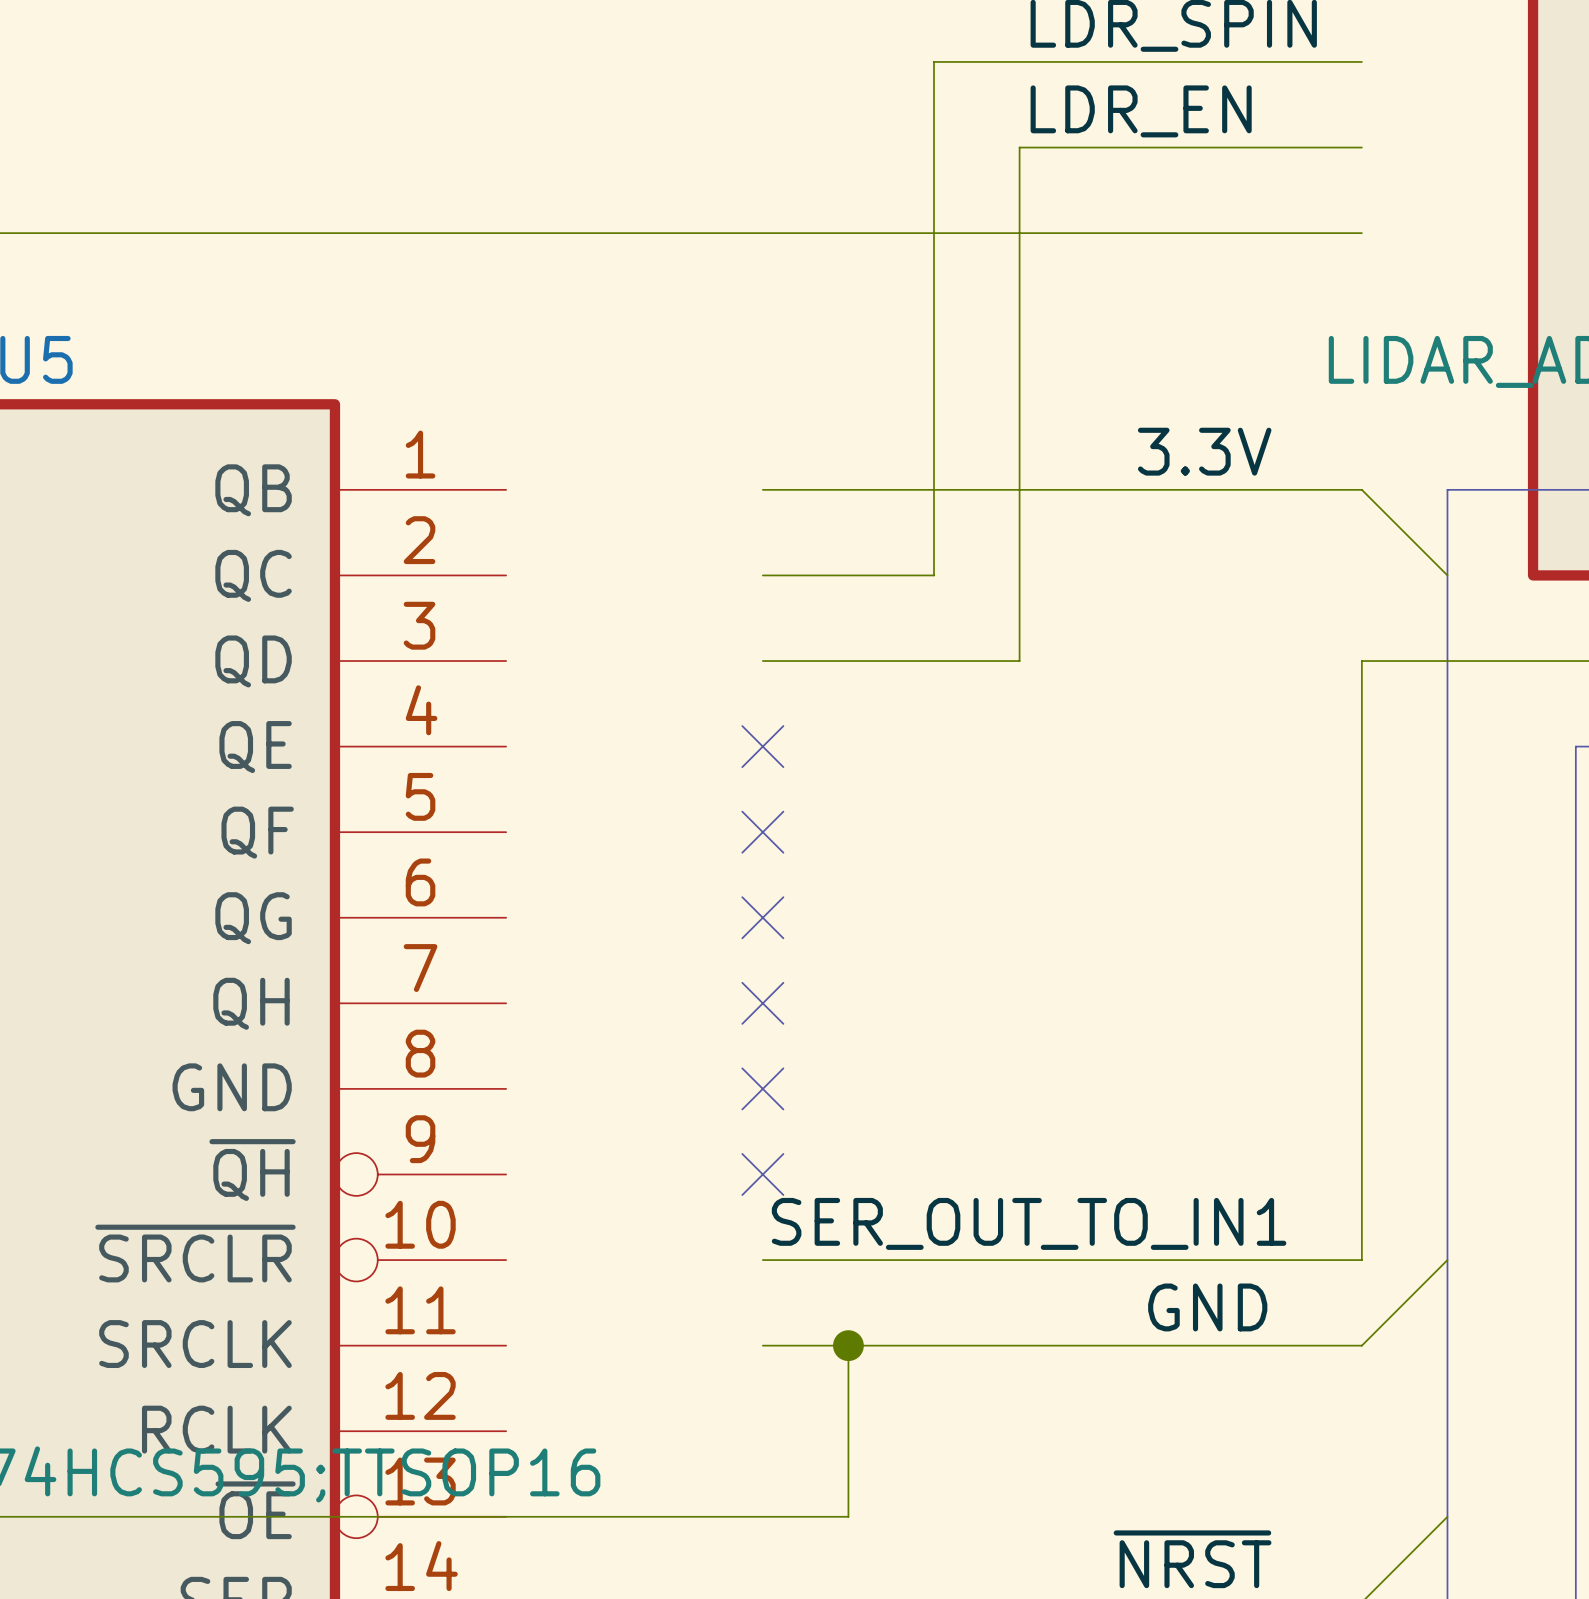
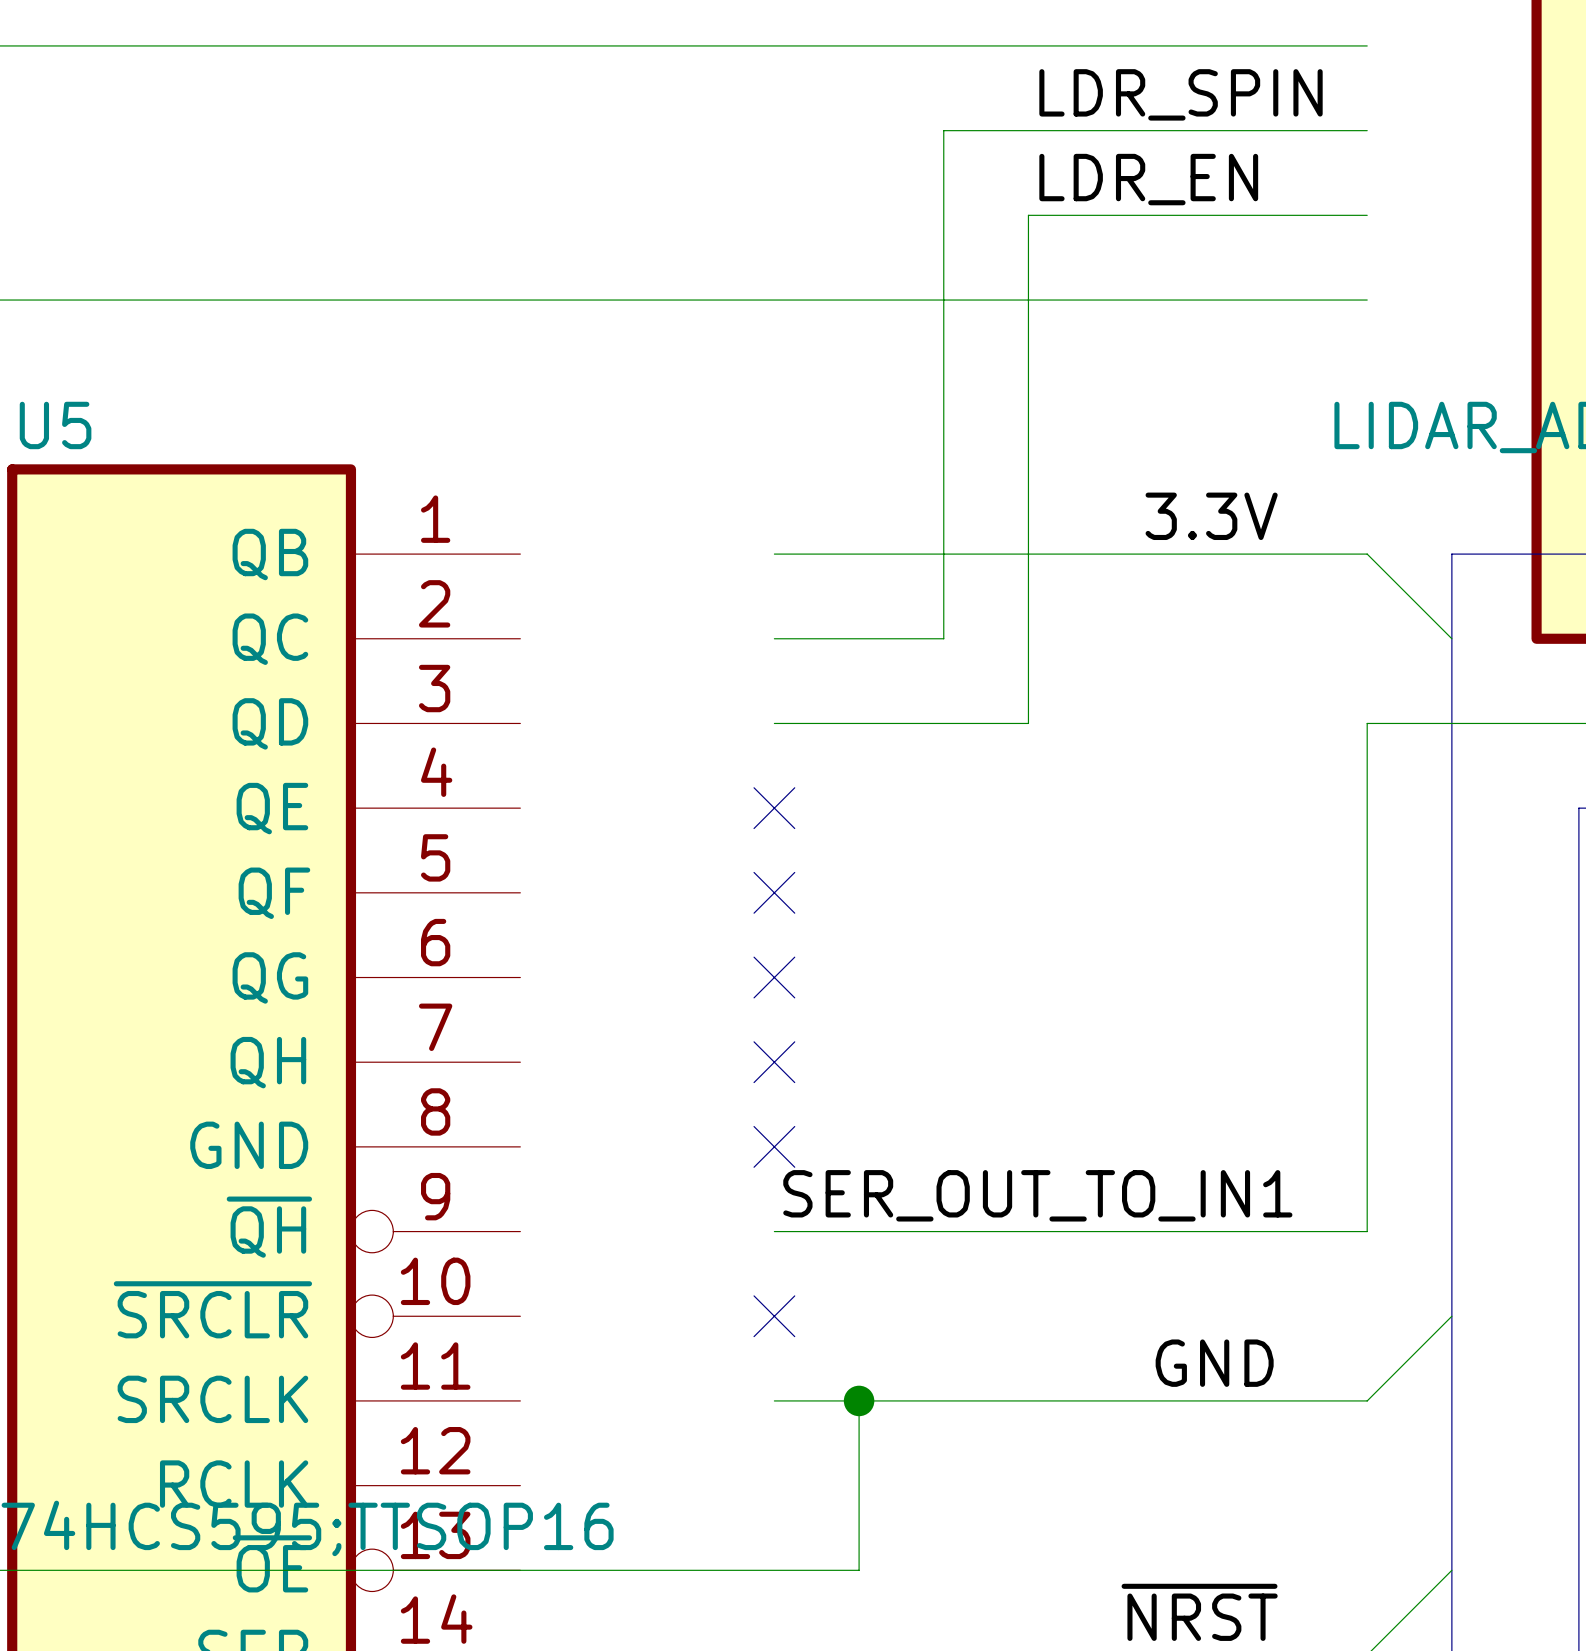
no-connect mark position: (762, 1174) -> (774, 1316)
wire: (1361, 1174) (1361, 1260) (762, 1260) -> (1367, 1231) (774, 1231)
label position: SER_OUT_TO_IN1 (1029, 1223) -> SER_OUT_TO_IN1 (1037, 1195)

